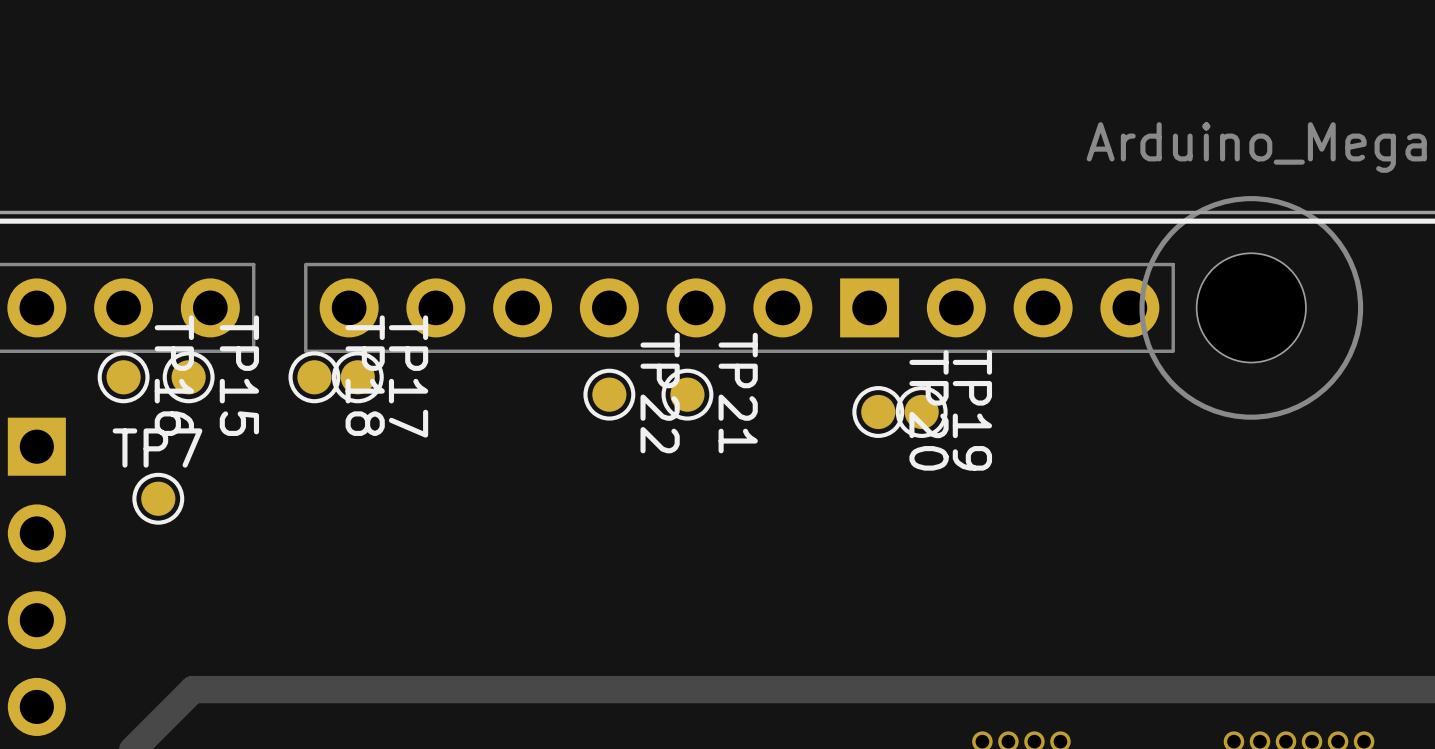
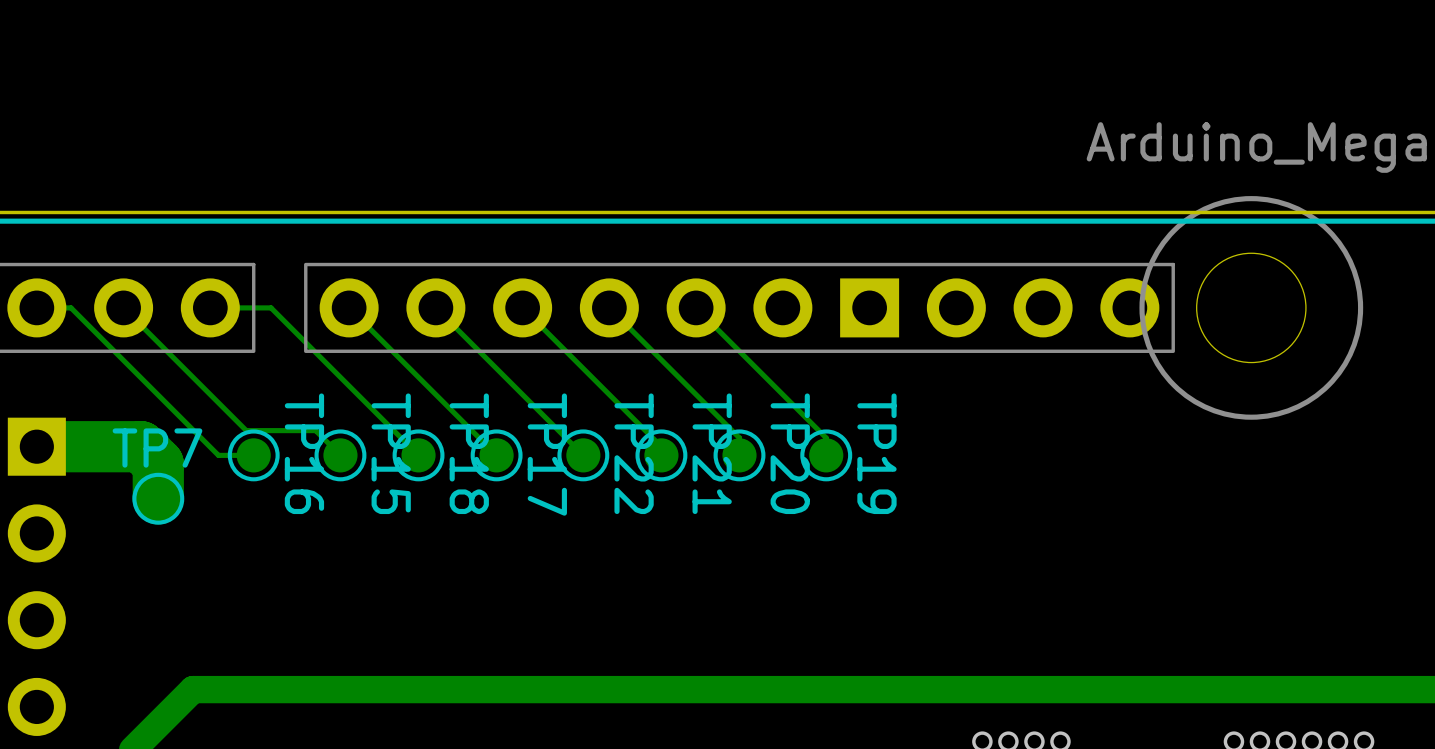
track: none -> (36, 307) (71, 307) (218, 455) (253, 455)
track: none -> (123, 307) (246, 430) (315, 430) (340, 455)
track: none -> (210, 307) (271, 307) (418, 455)
track: none -> (349, 307) (496, 455)
track: none -> (435, 307) (583, 455)
track: none -> (522, 307) (661, 446) (661, 455)
track: none -> (609, 307) (739, 438) (739, 455)
track: none -> (696, 307) (826, 438) (826, 455)
TP16 position: (123, 377) -> (253, 455)
TP15 position: (188, 377) -> (340, 455)
TP18 position: (314, 377) -> (418, 455)
TP17 position: (357, 377) -> (496, 455)
TP22 position: (609, 394) -> (583, 455)
TP21 position: (687, 394) -> (661, 455)
TP20 position: (878, 412) -> (739, 455)
TP19 position: (921, 412) -> (826, 455)
track: none -> (36, 446) (140, 446) (158, 464) (158, 498)

